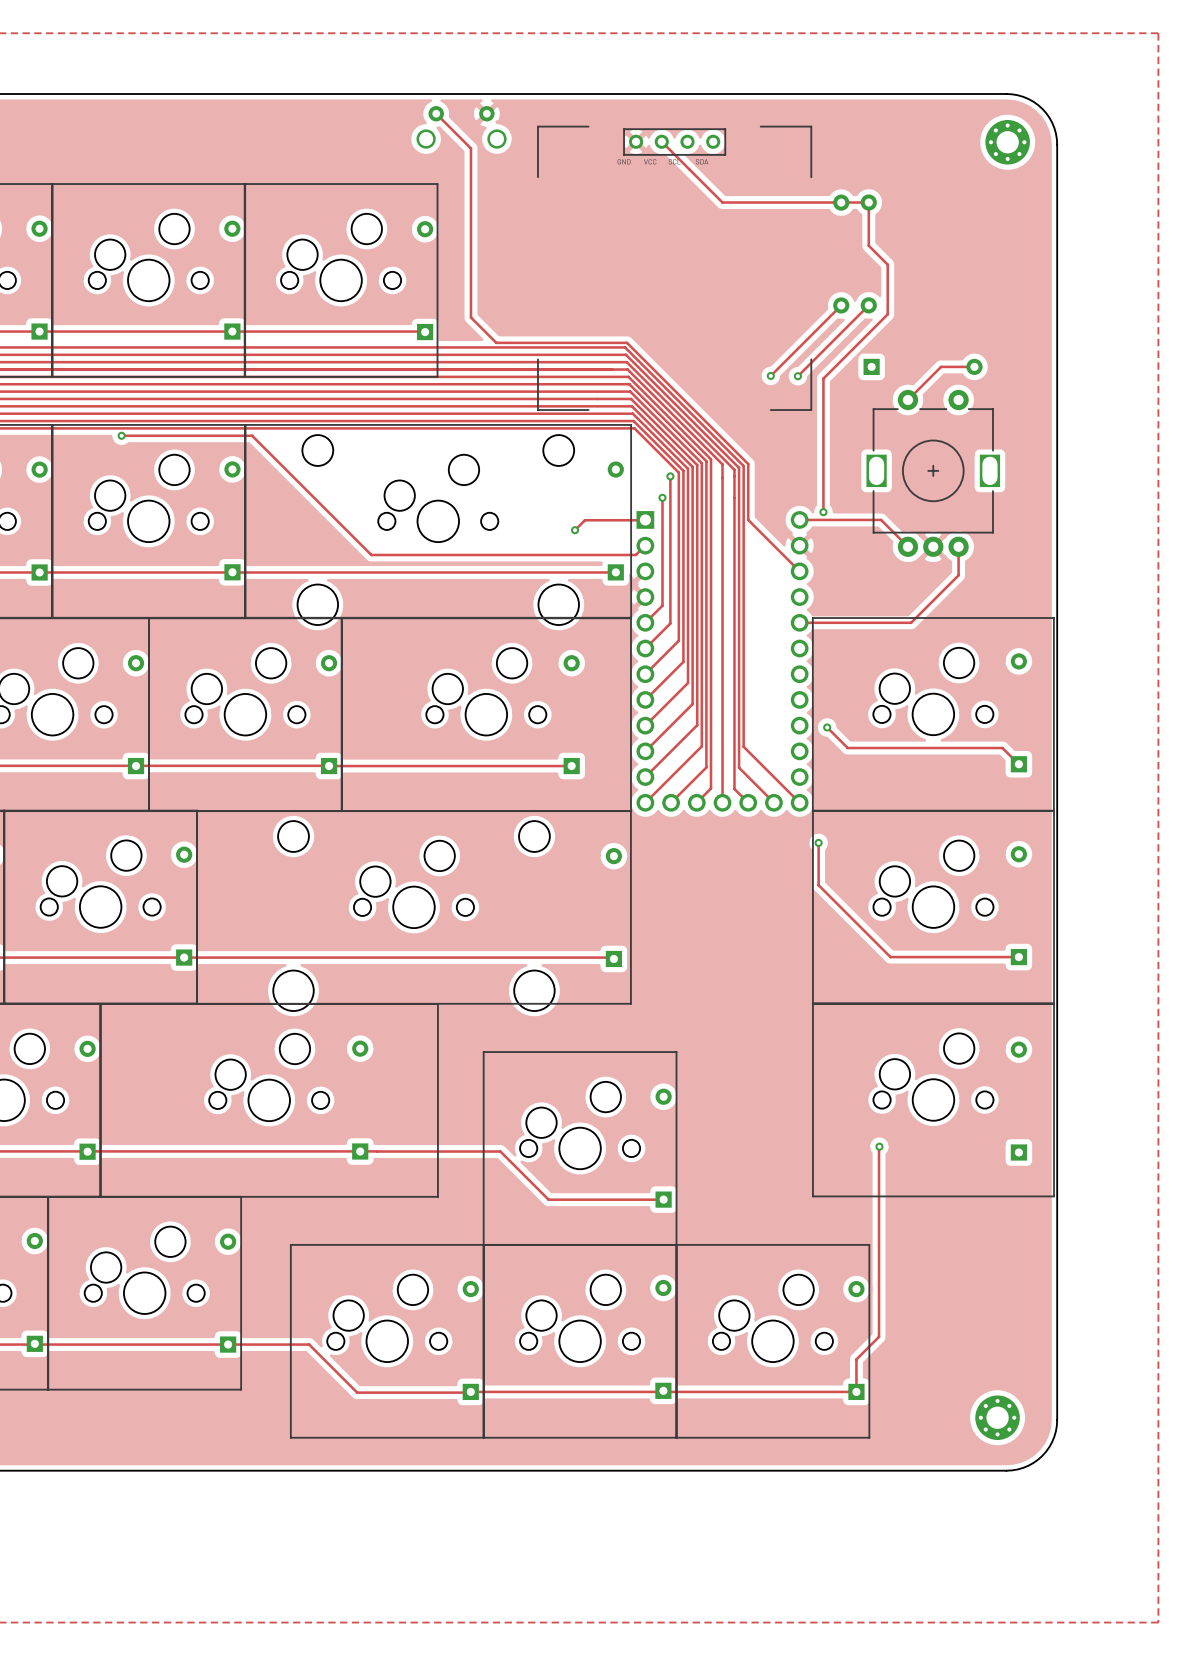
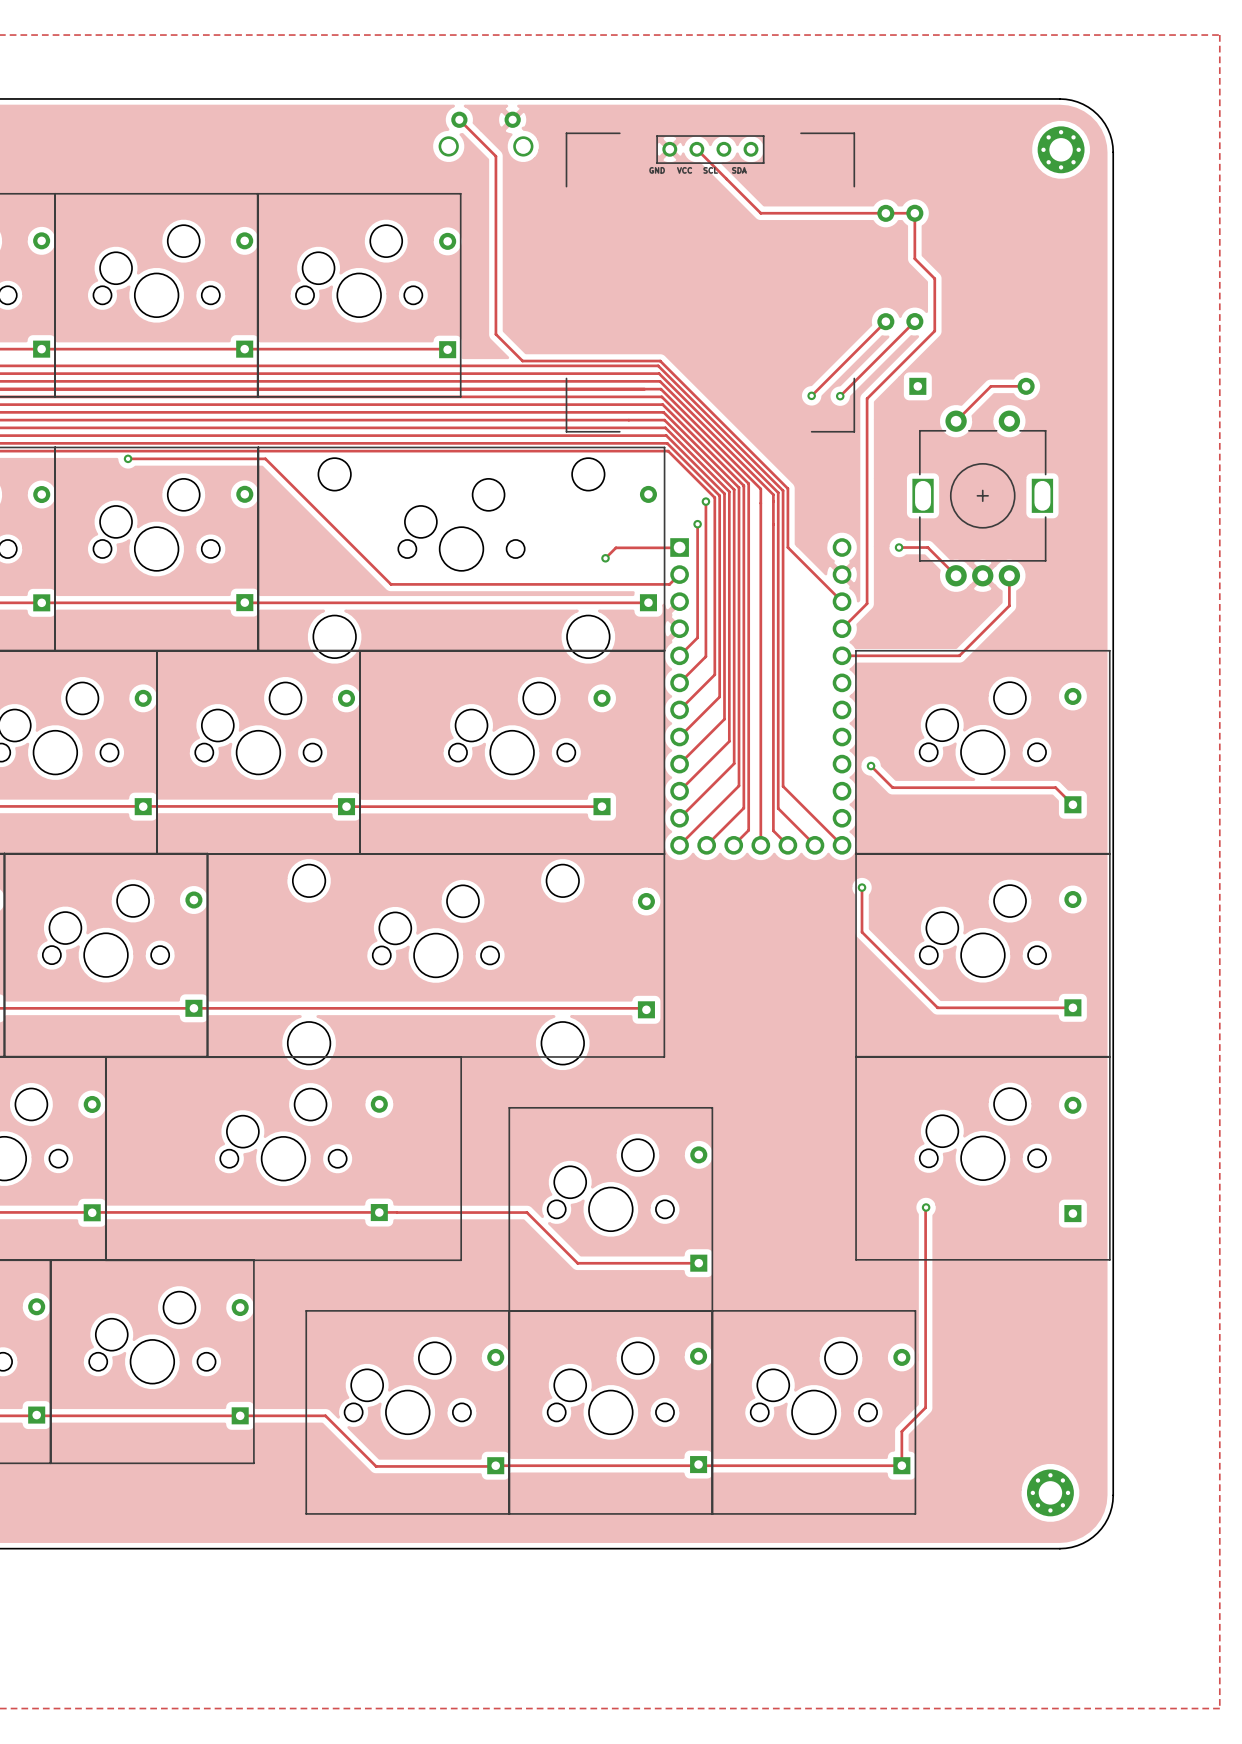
track: none -> (867, 539) (867, 603) (842, 628)
via position: (823, 512) -> (899, 547)

